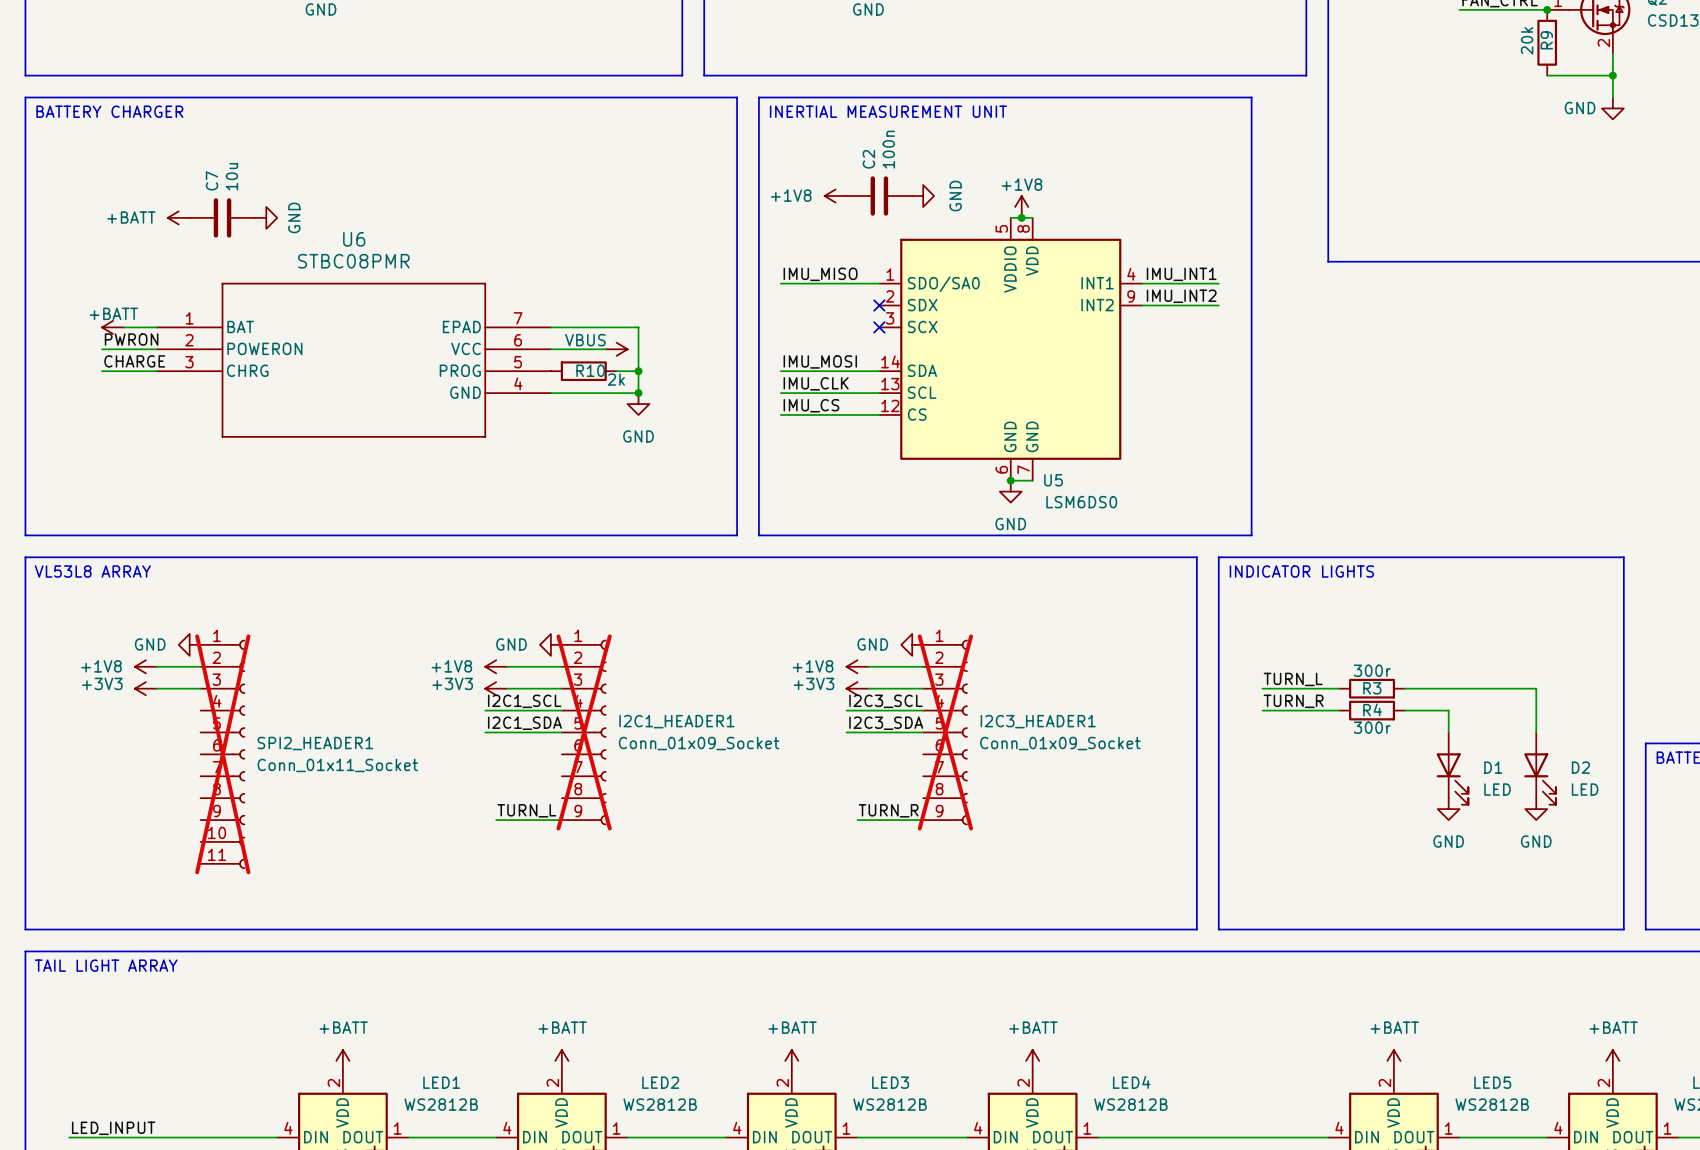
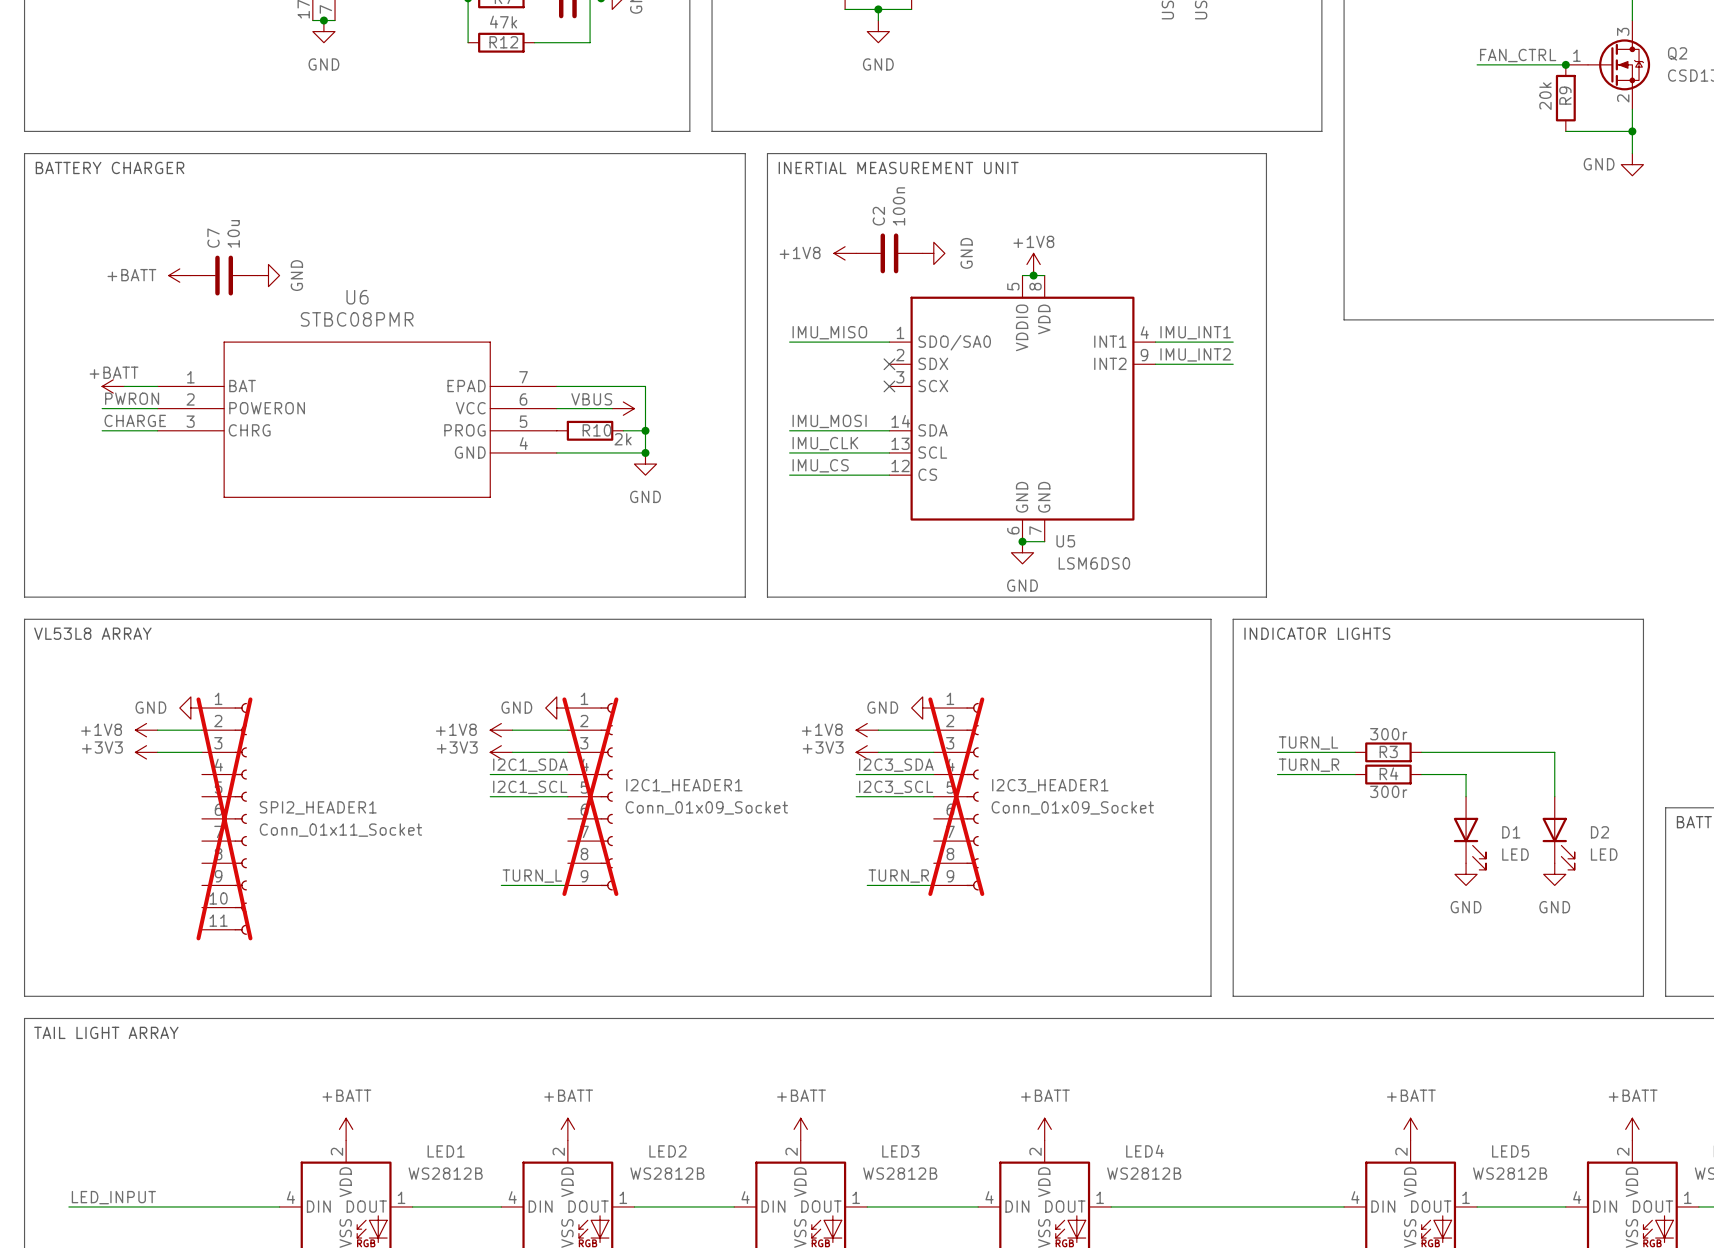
label: I2C1_SCL (524, 701) -> I2C1_SDA (530, 765)
label: I2C3_SCL (885, 701) -> I2C3_SDA (896, 765)
label: I2C1_SDA (524, 723) -> I2C1_SCL (530, 787)
label: I2C3_SDA (886, 723) -> I2C3_SCL (896, 787)

